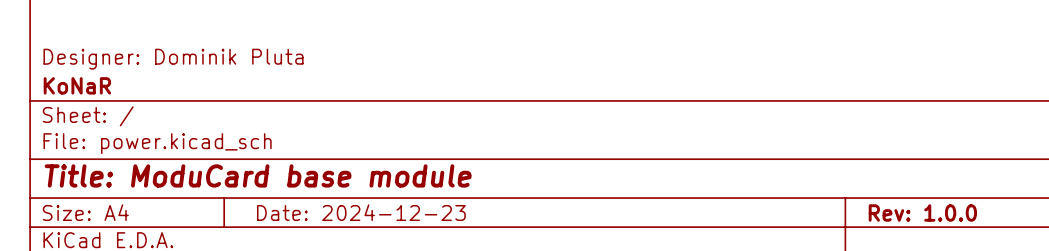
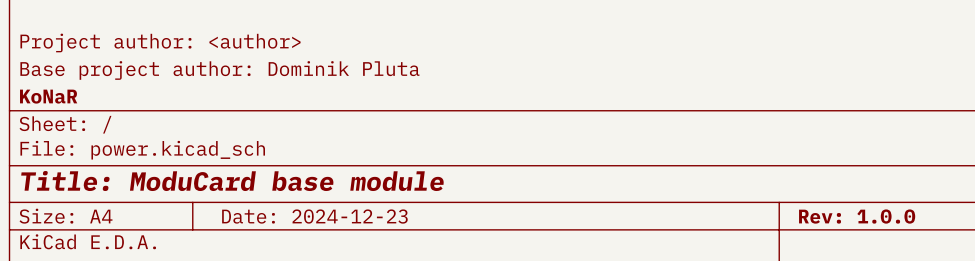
title block: none -> Project author: <author> (160, 42)
title block: Designer: Dominik Pluta (173, 59) -> Base project author: Dominik Pluta (219, 70)

